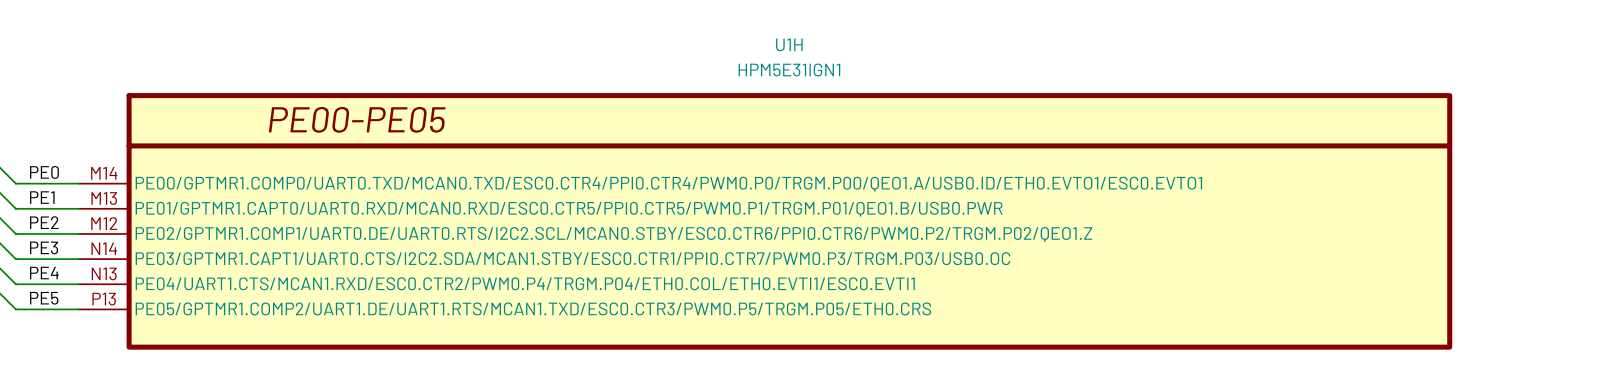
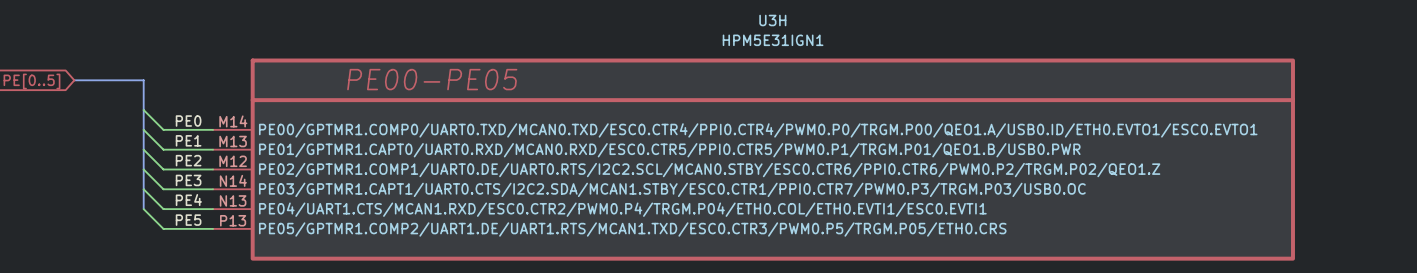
U1H name: U1H (789, 44) -> U3H (772, 20)

